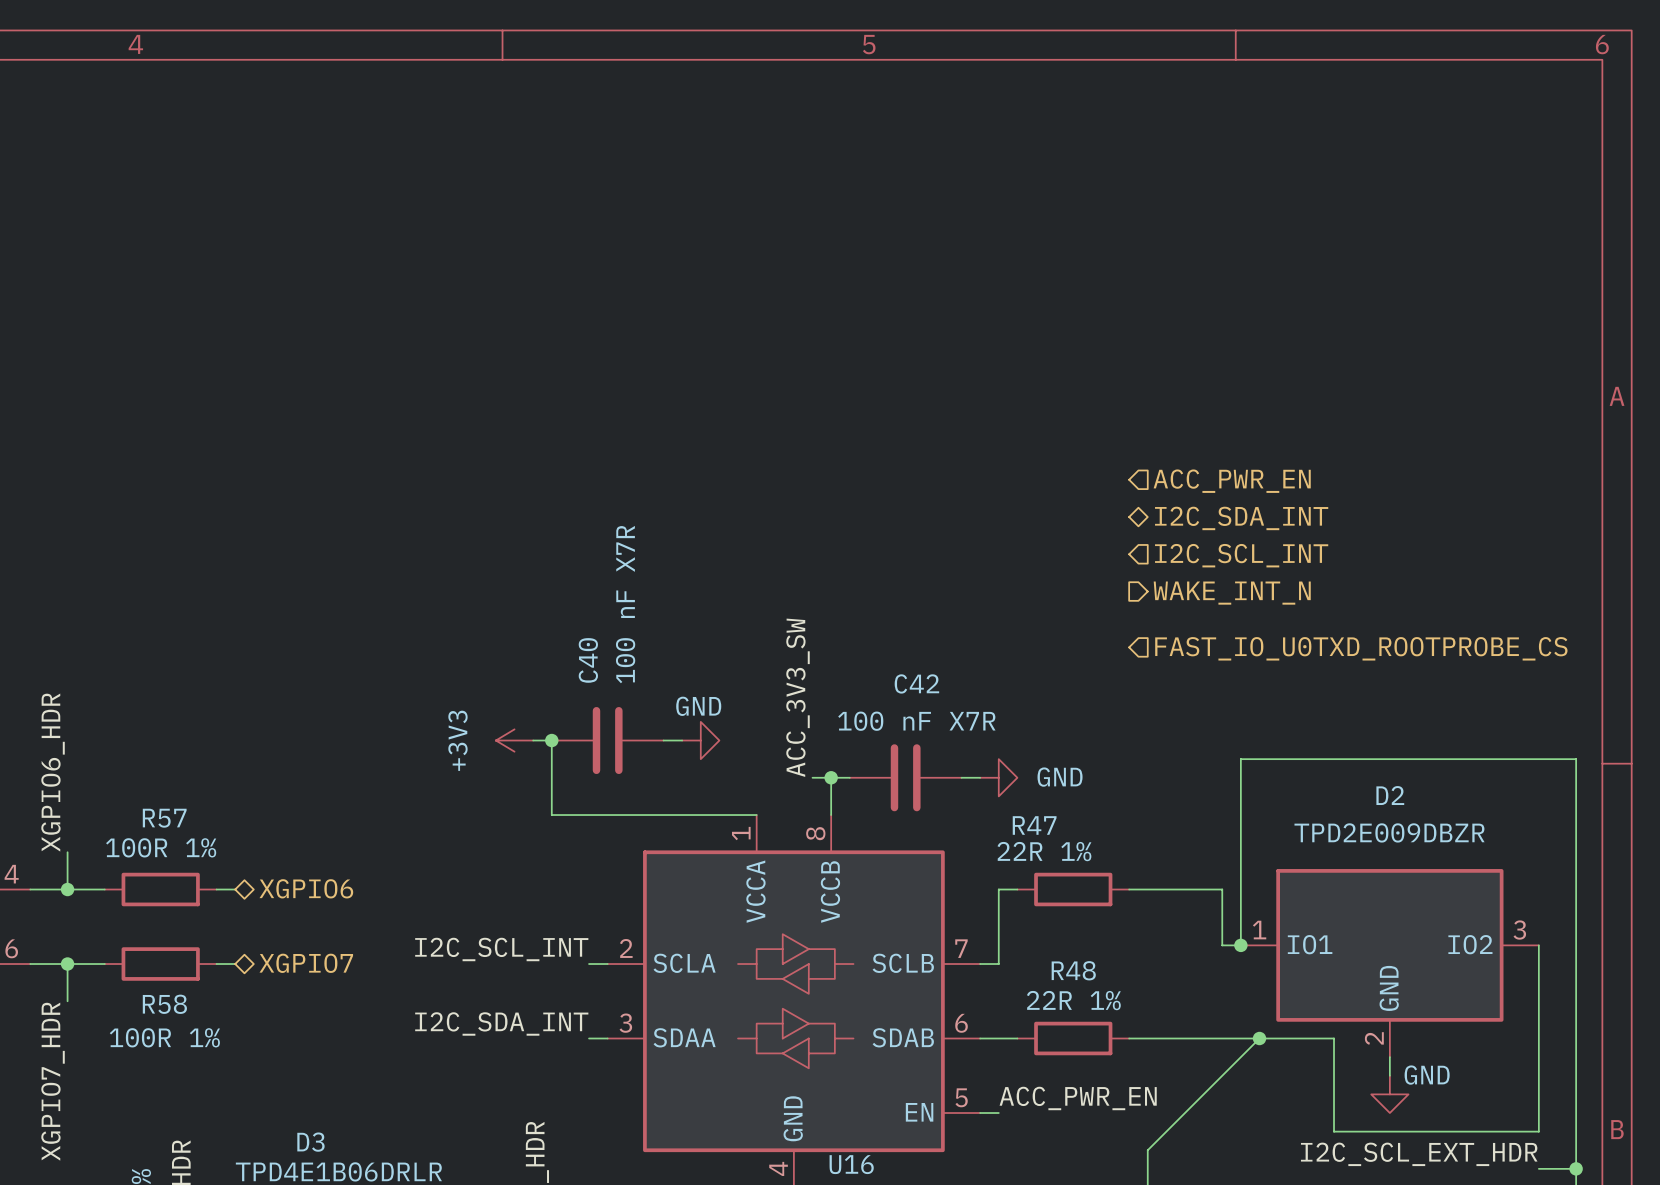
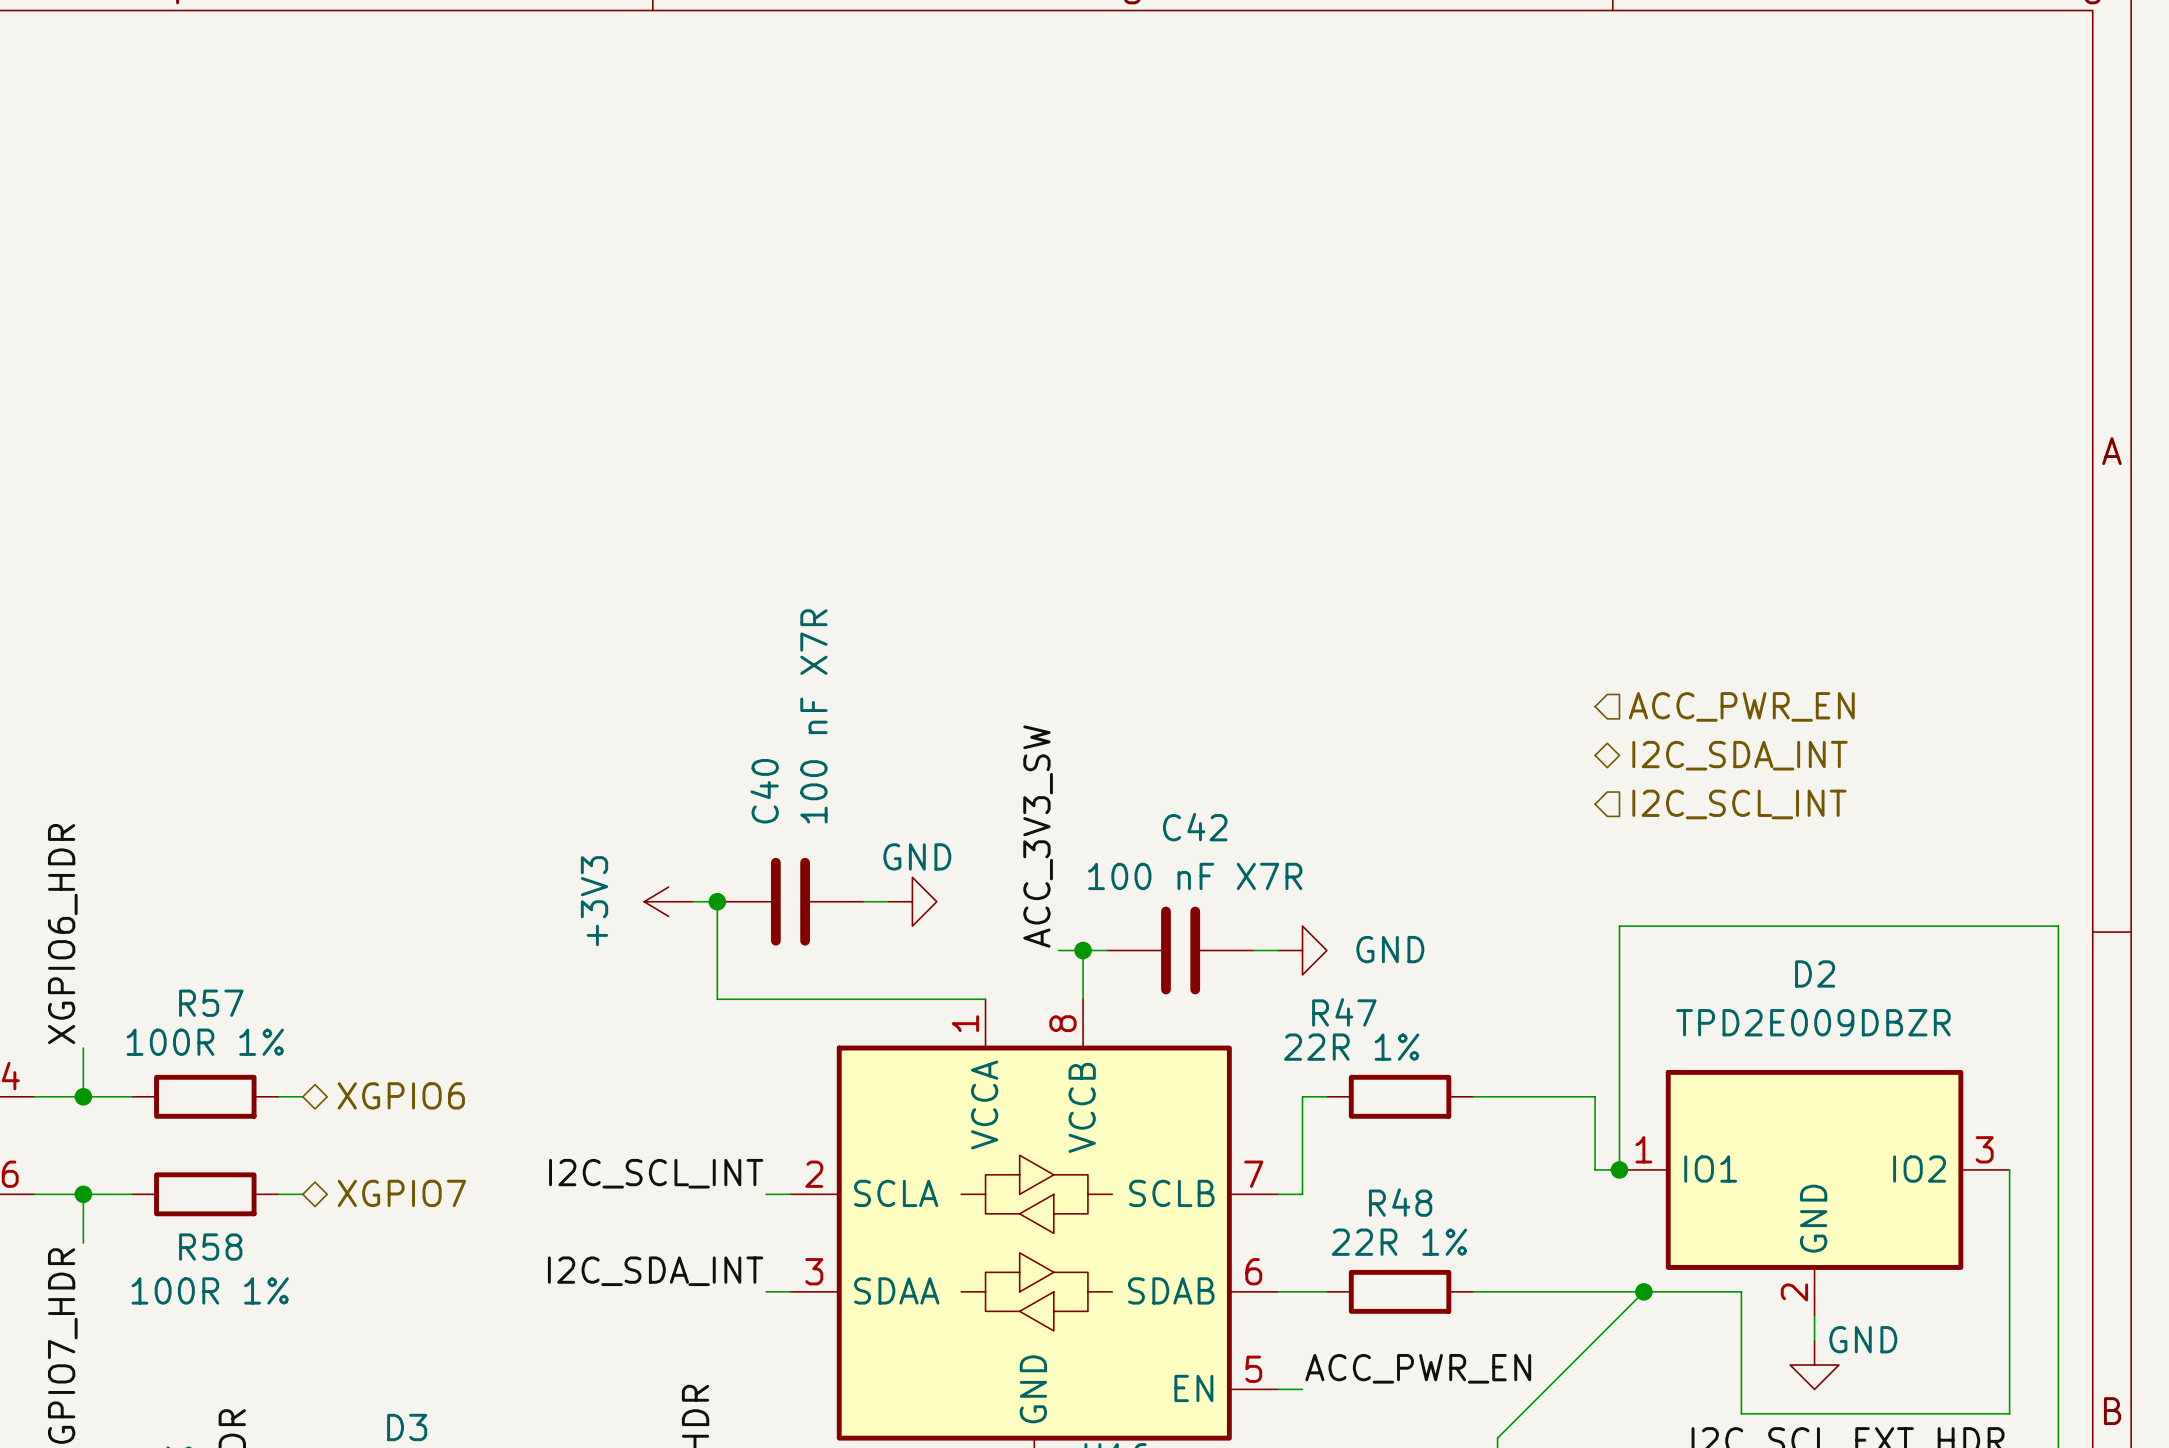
hierarchical label position: ACC_PWR_EN (1232, 481) -> ACC_PWR_EN (1741, 706)
hierarchical label position: I2C_SDA_INT (1241, 518) -> I2C_SDA_INT (1740, 755)
hierarchical label position: I2C_SCL_INT (1241, 555) -> I2C_SCL_INT (1739, 804)
hierarchical label: WAKE_INT_N (1232, 593) -> none
hierarchical label: FAST_IO_U0TXD_ROOTPROBE_CS (1361, 648) -> none

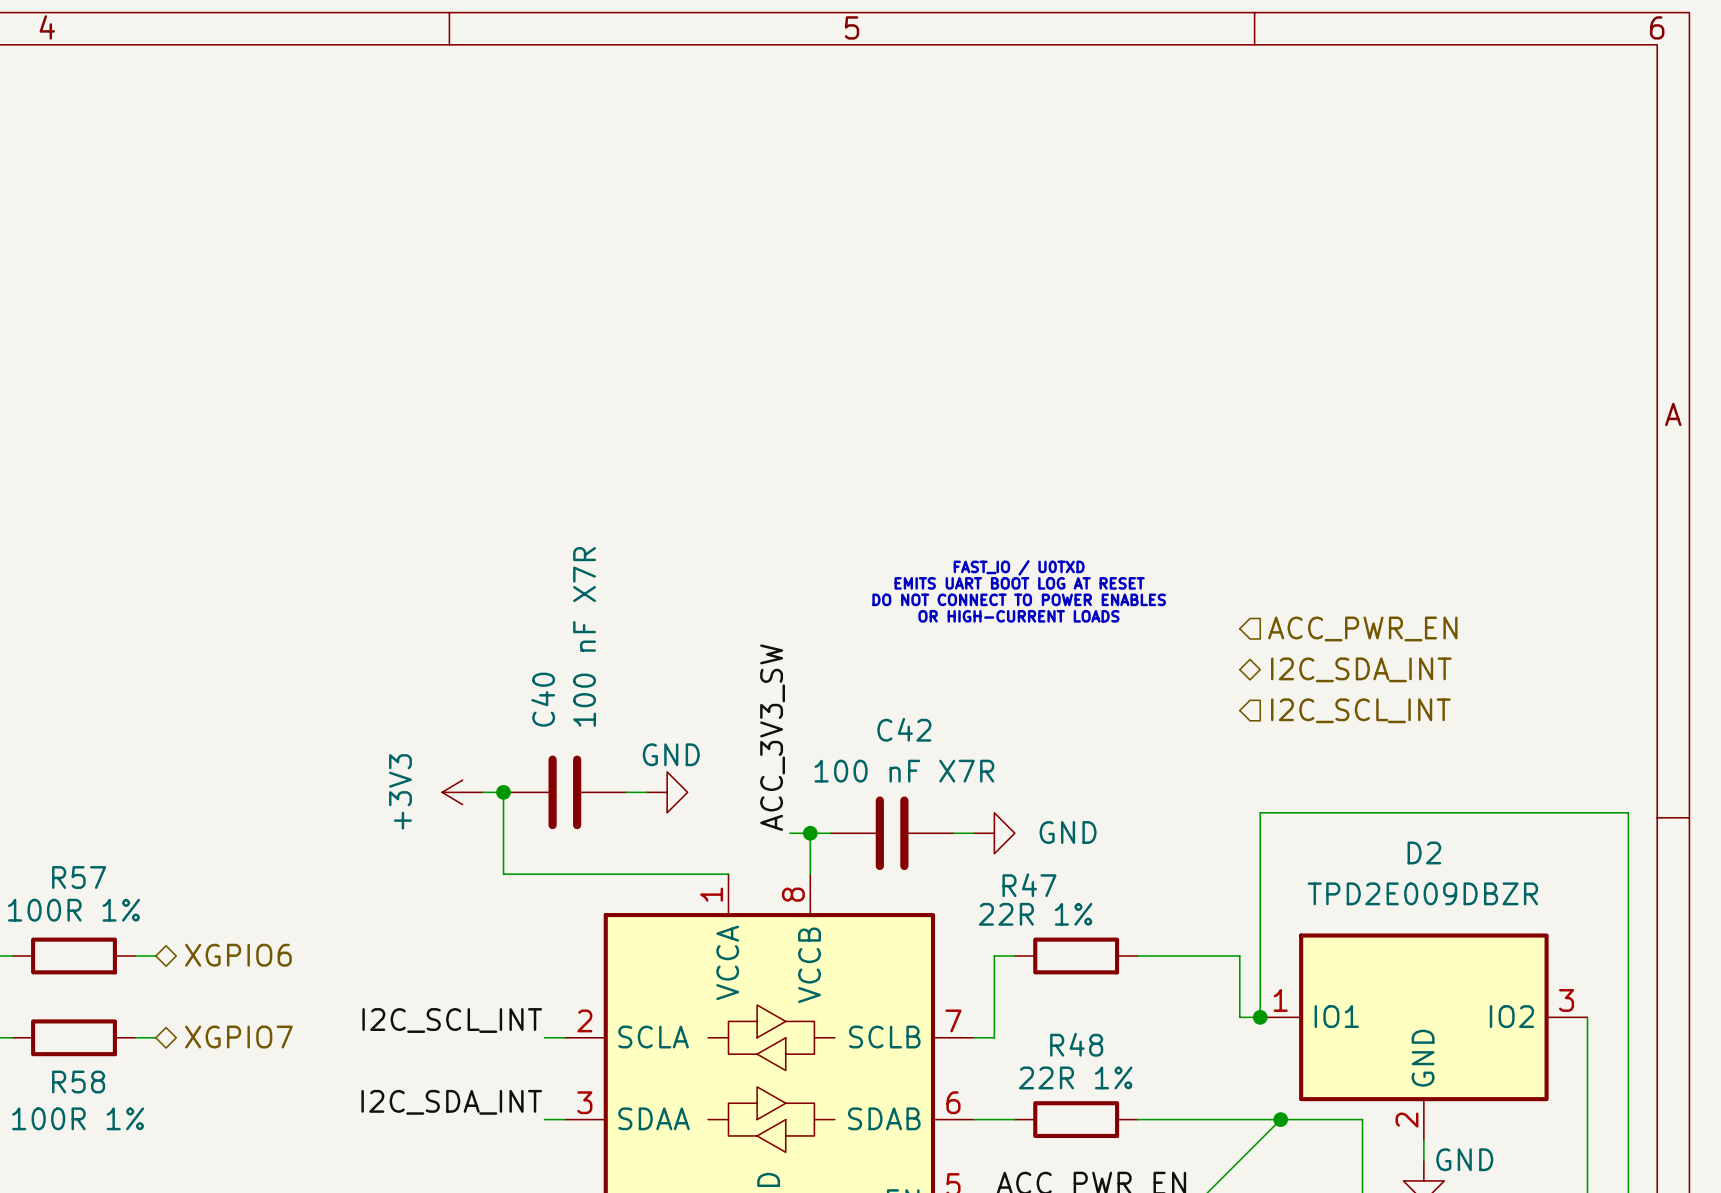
text: none -> FAST_IO / U0TXD (1019, 567)
text: none -> EMITS UART BOOT LOG AT RESET (1019, 583)
text: none -> DO NOT CONNECT TO POWER ENABLES (1019, 599)
text: none -> OR HIGH-CURRENT LOADS (1018, 616)

